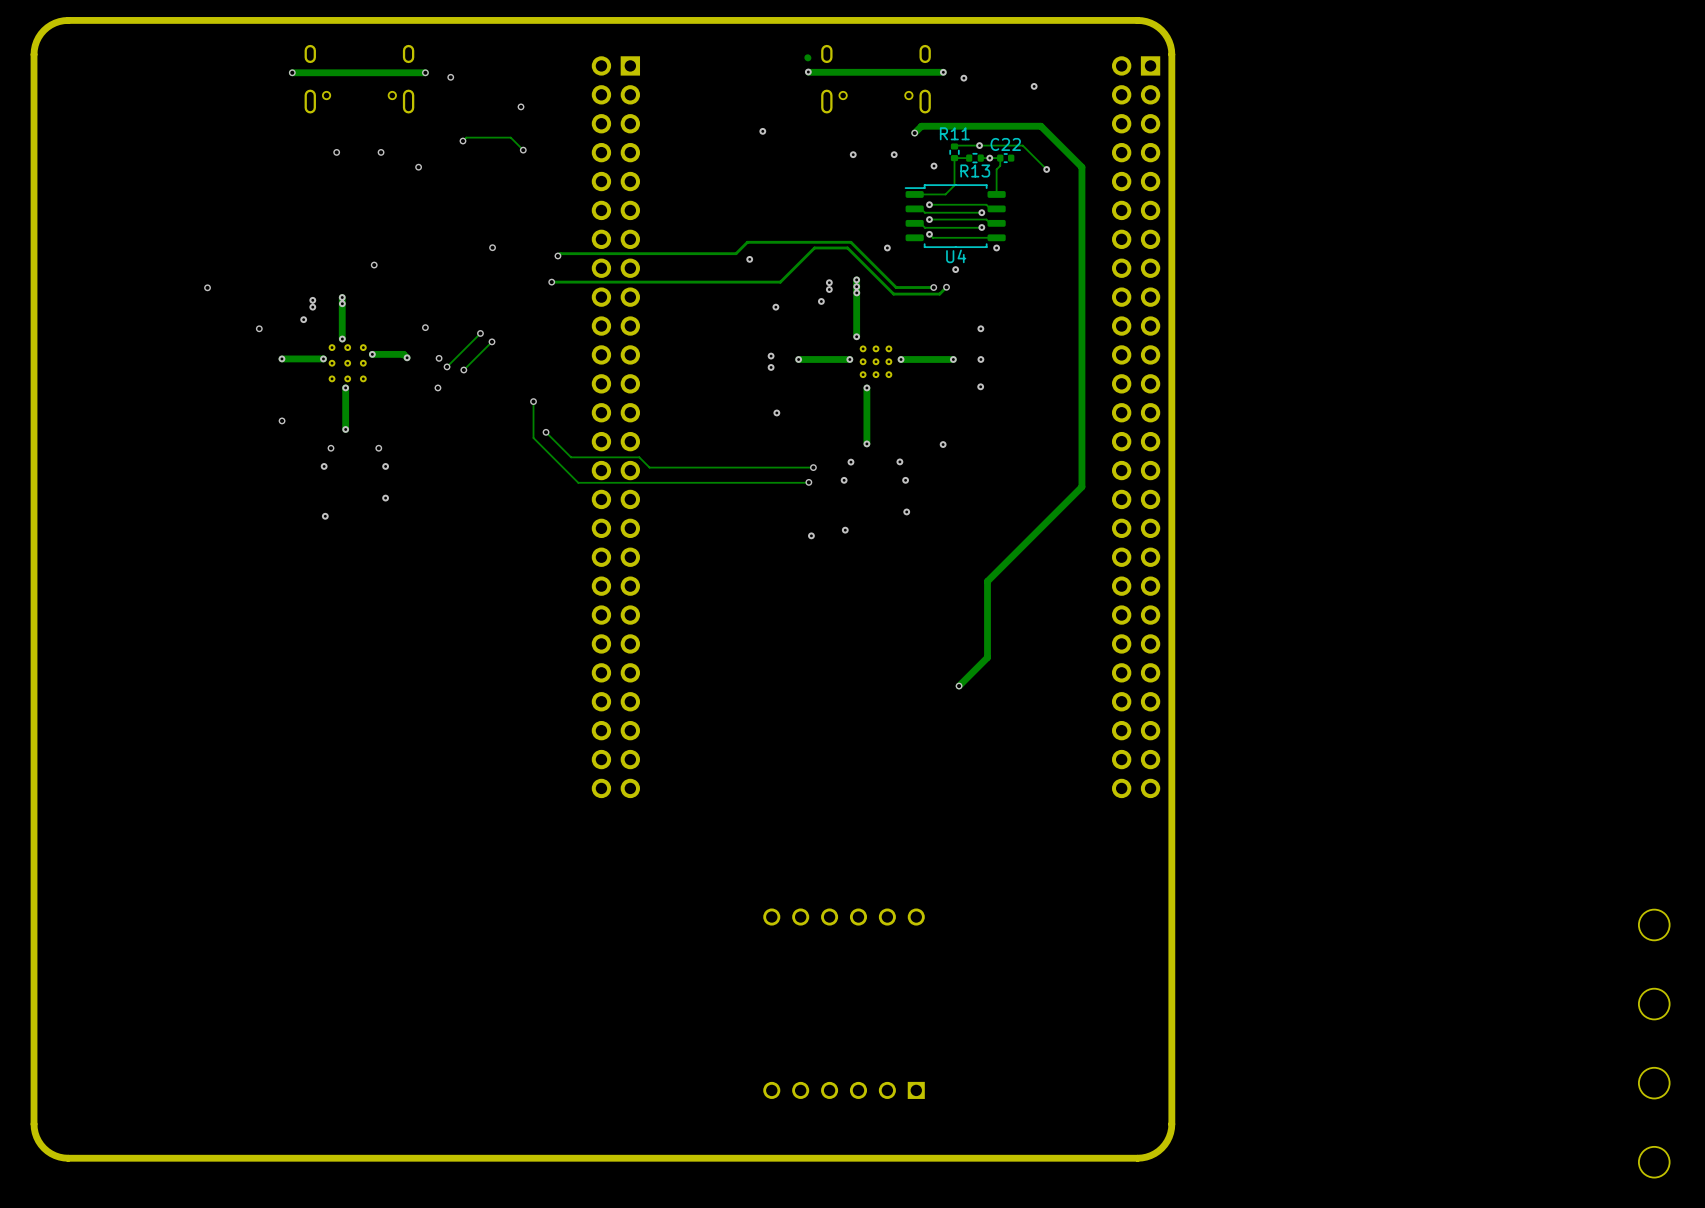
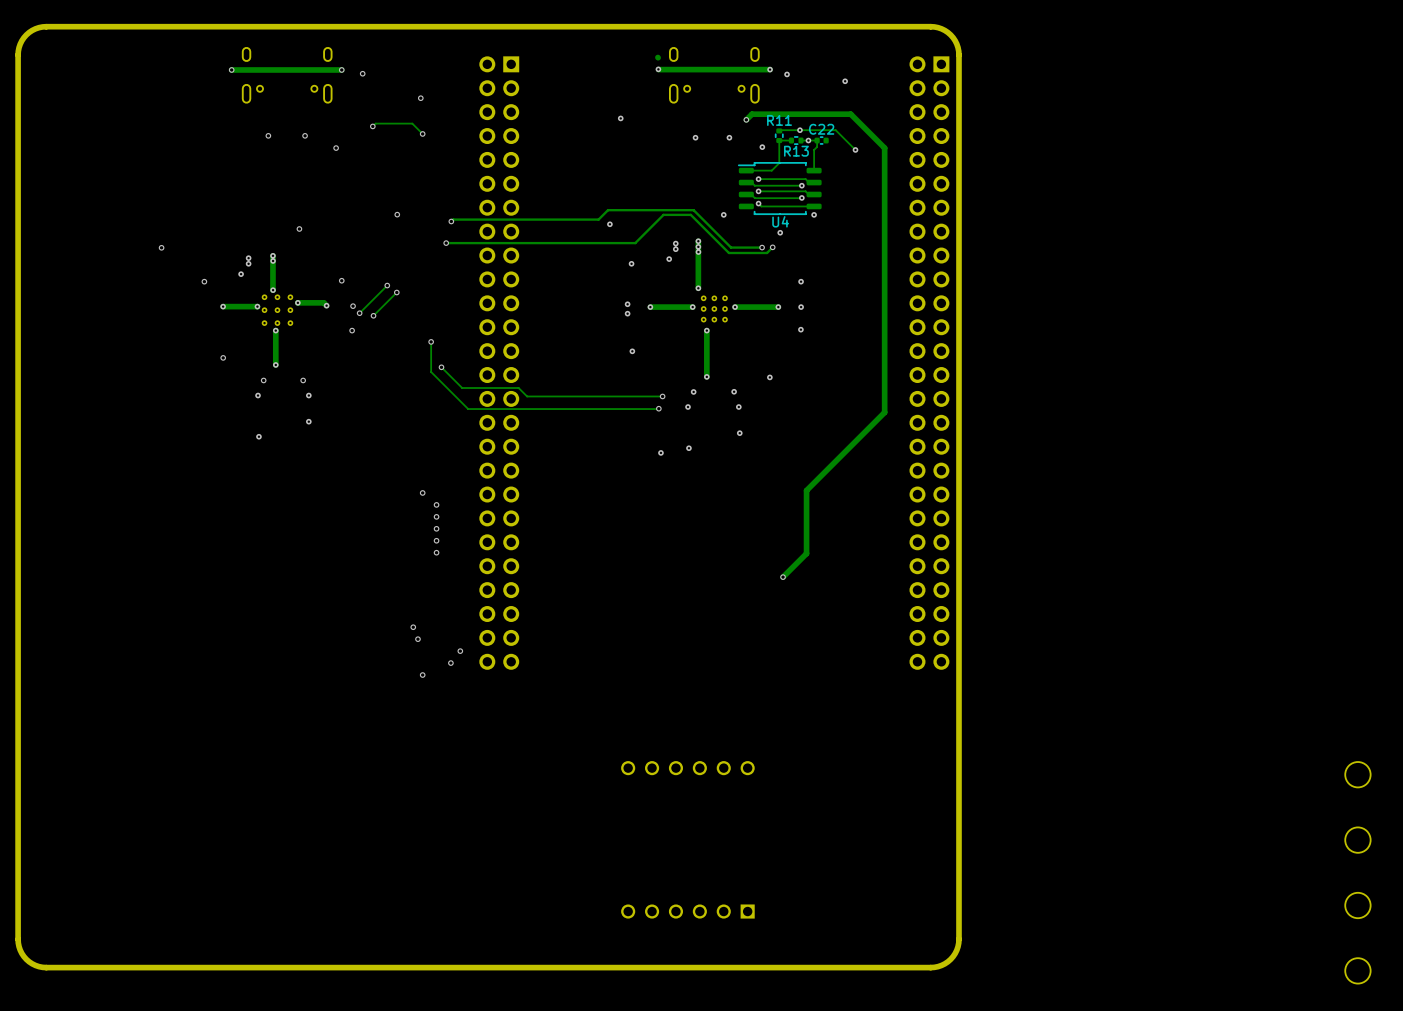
via: none -> (422, 492)
via: none -> (436, 504)
via: none -> (436, 516)
via: none -> (436, 528)
via: none -> (436, 540)
via: none -> (436, 552)
via: none -> (413, 627)
via: none -> (417, 639)
via: none -> (460, 651)
via: none -> (450, 663)
via: none -> (422, 675)

